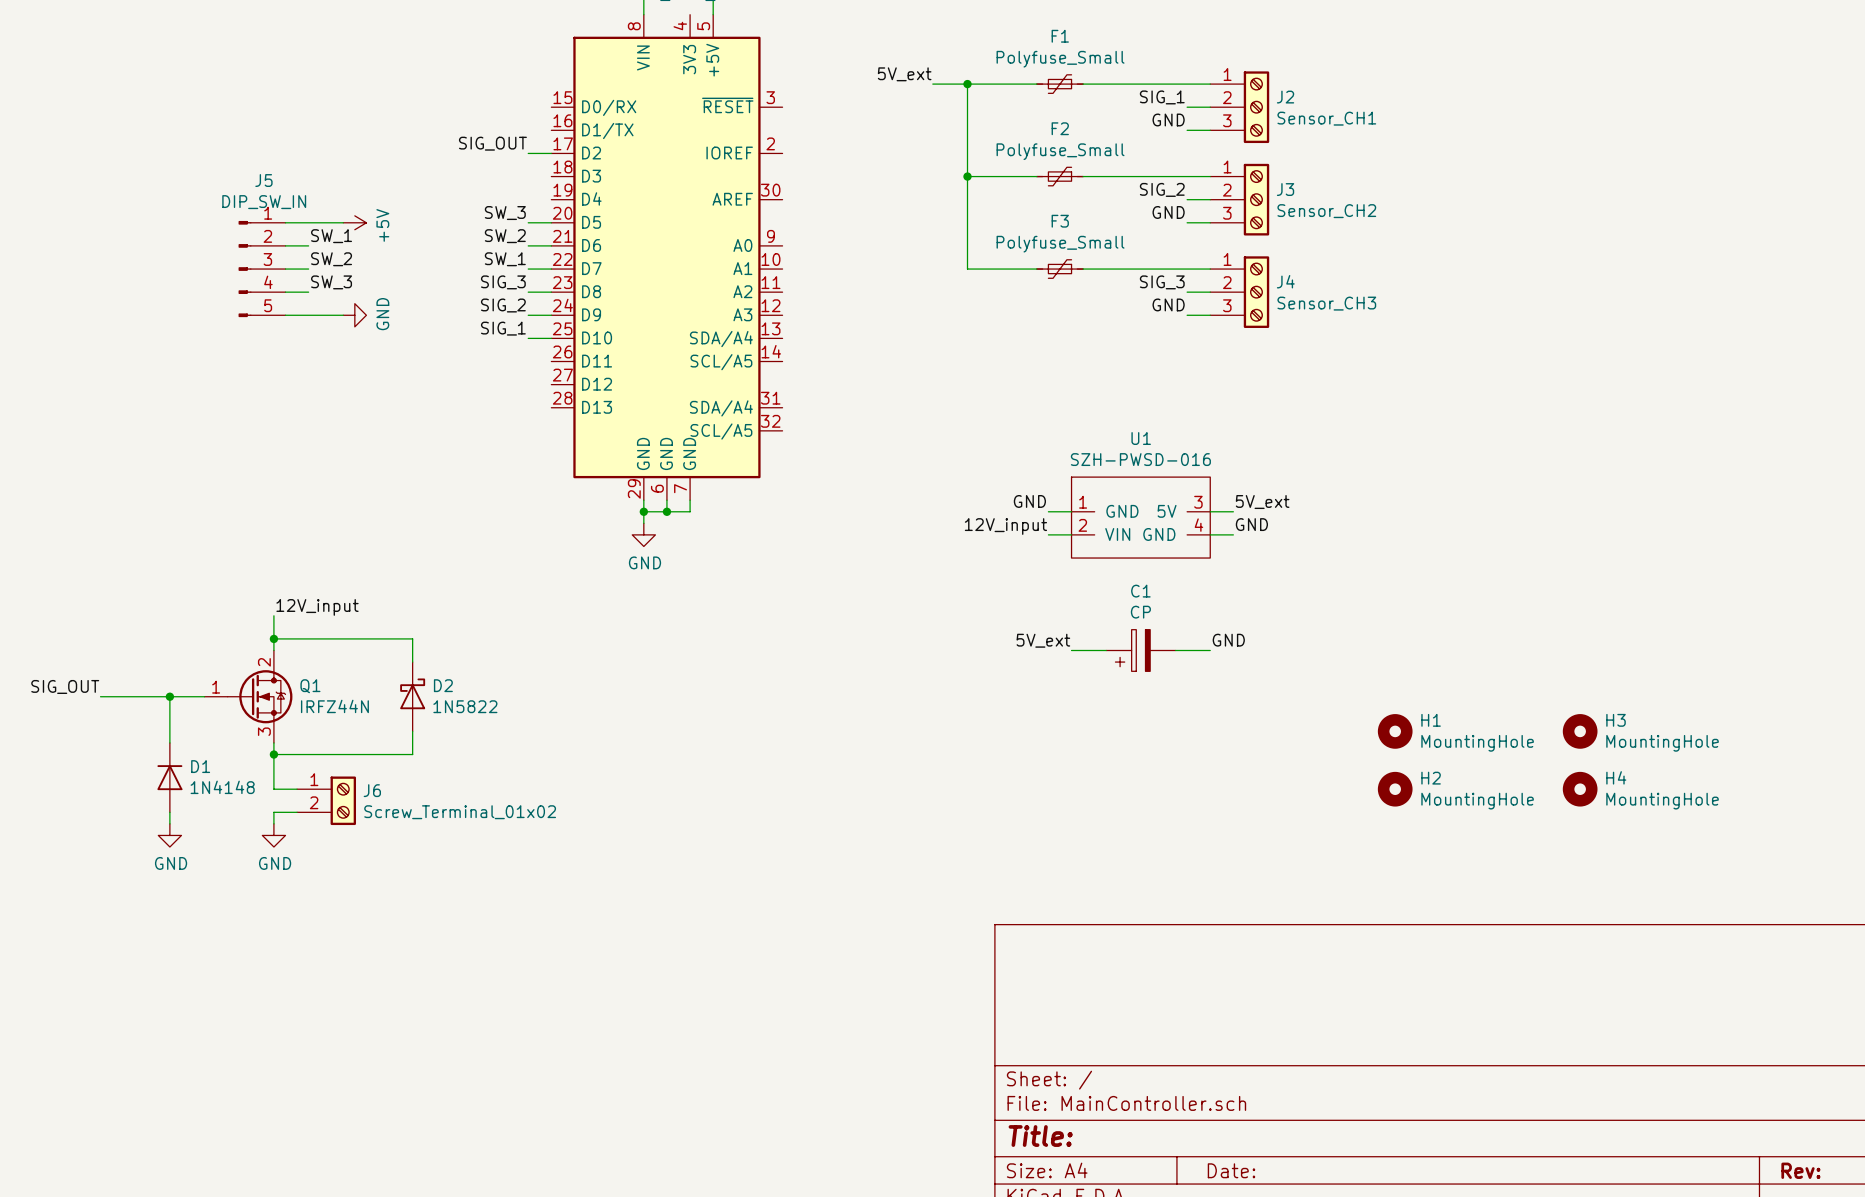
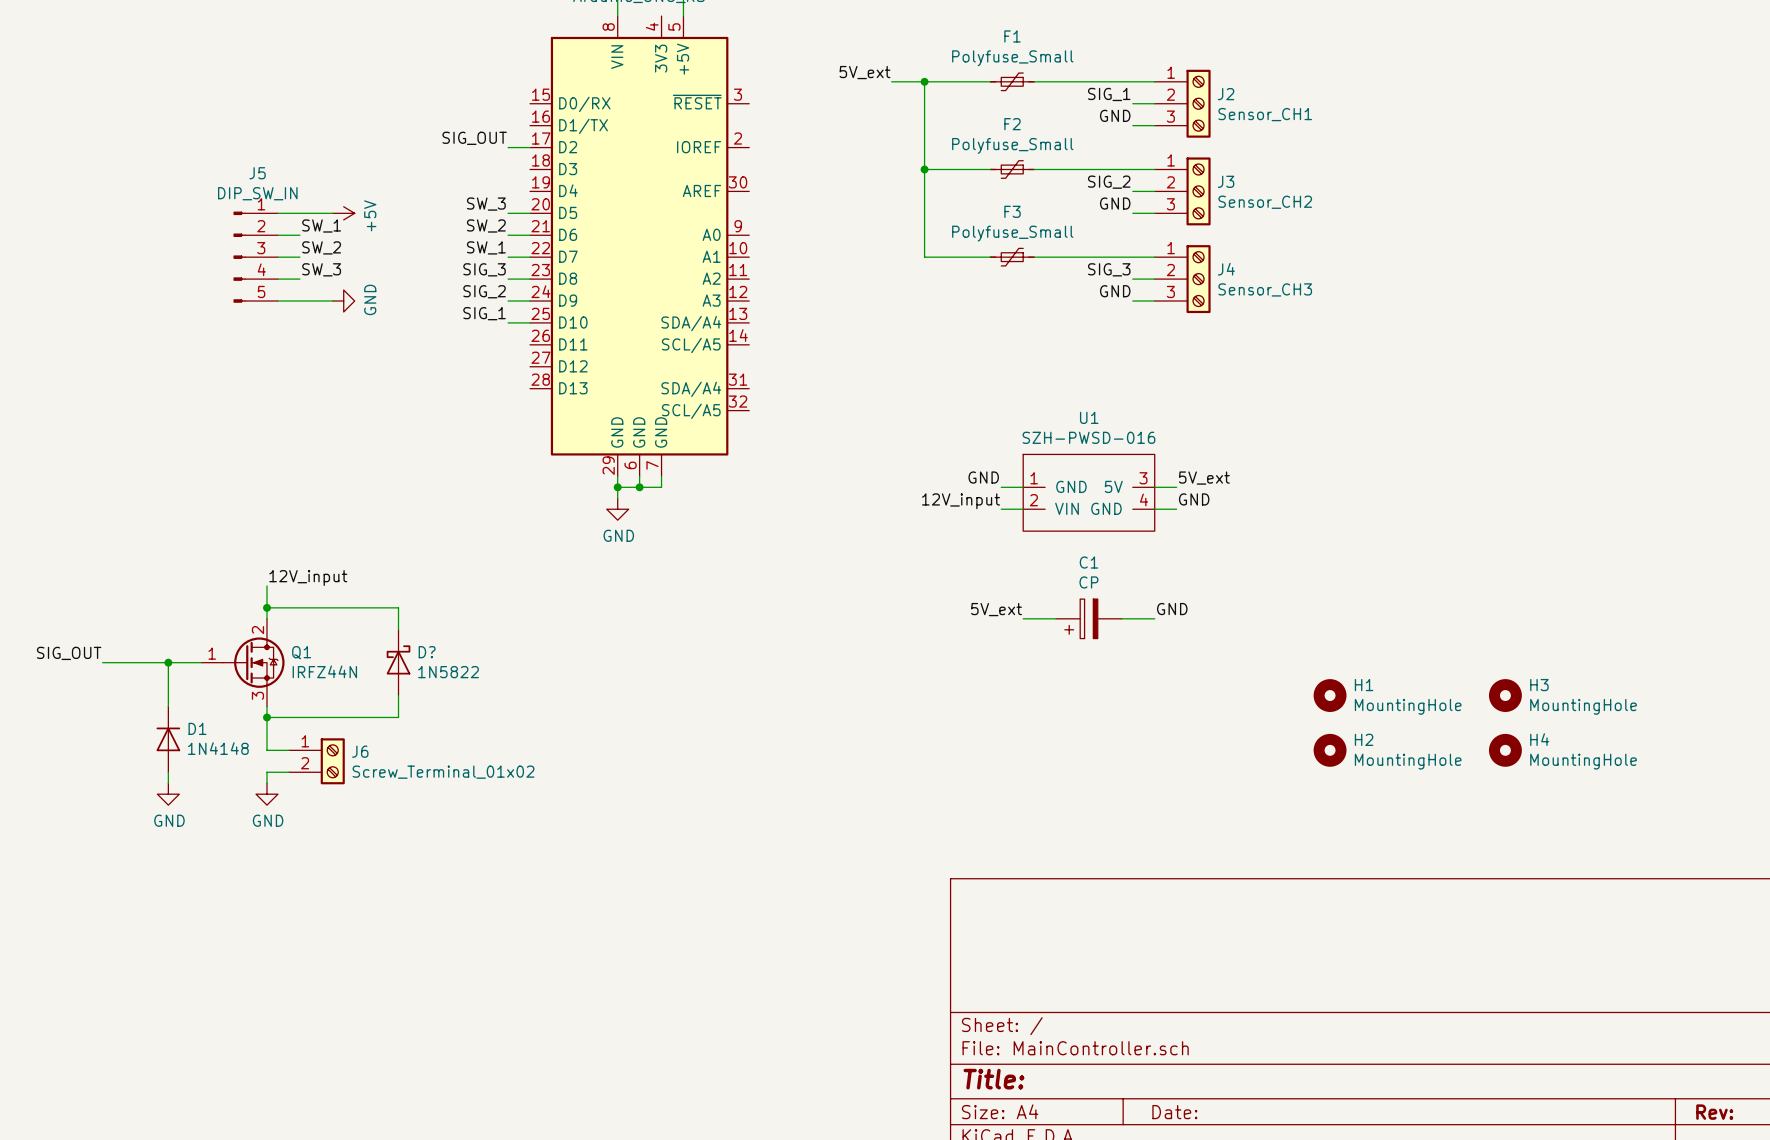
D2 name: D2 (443, 685) -> D? (427, 652)

